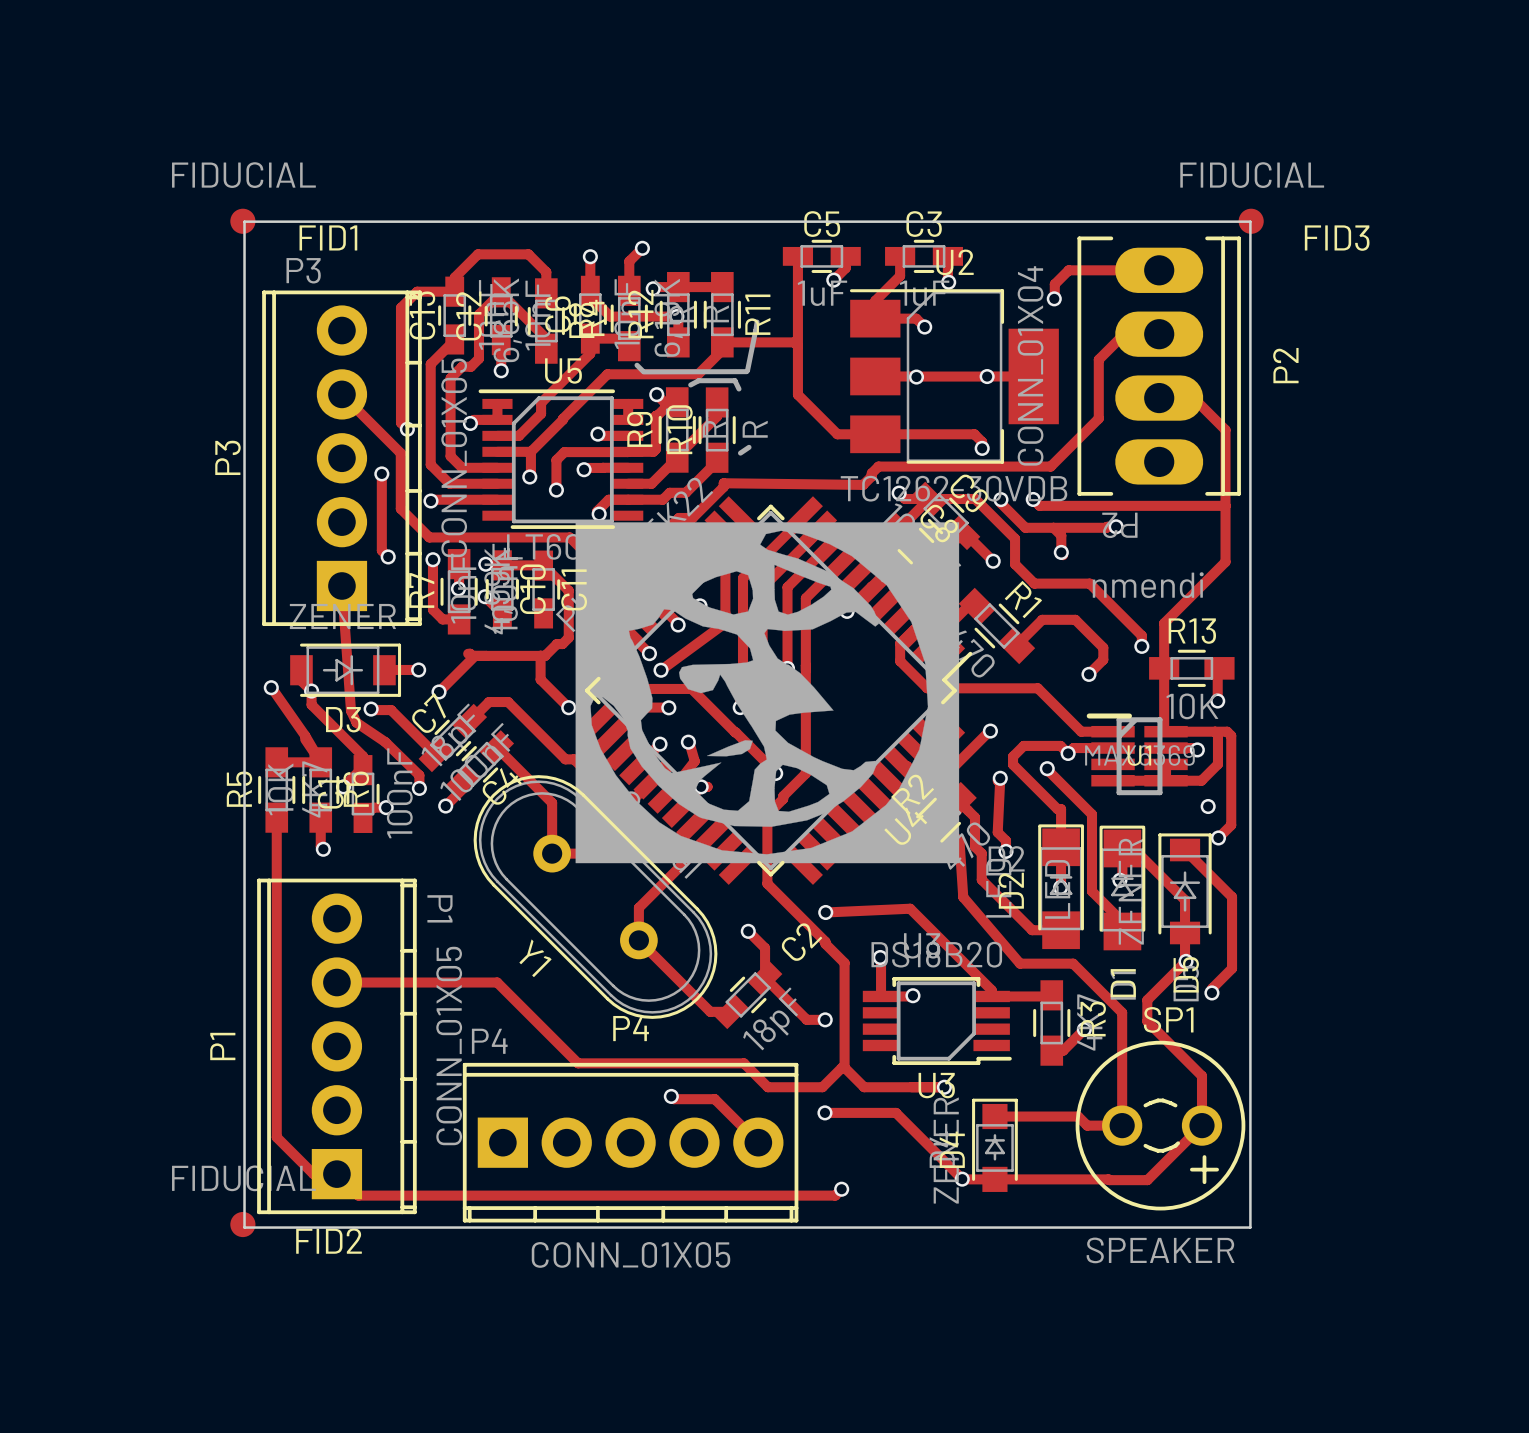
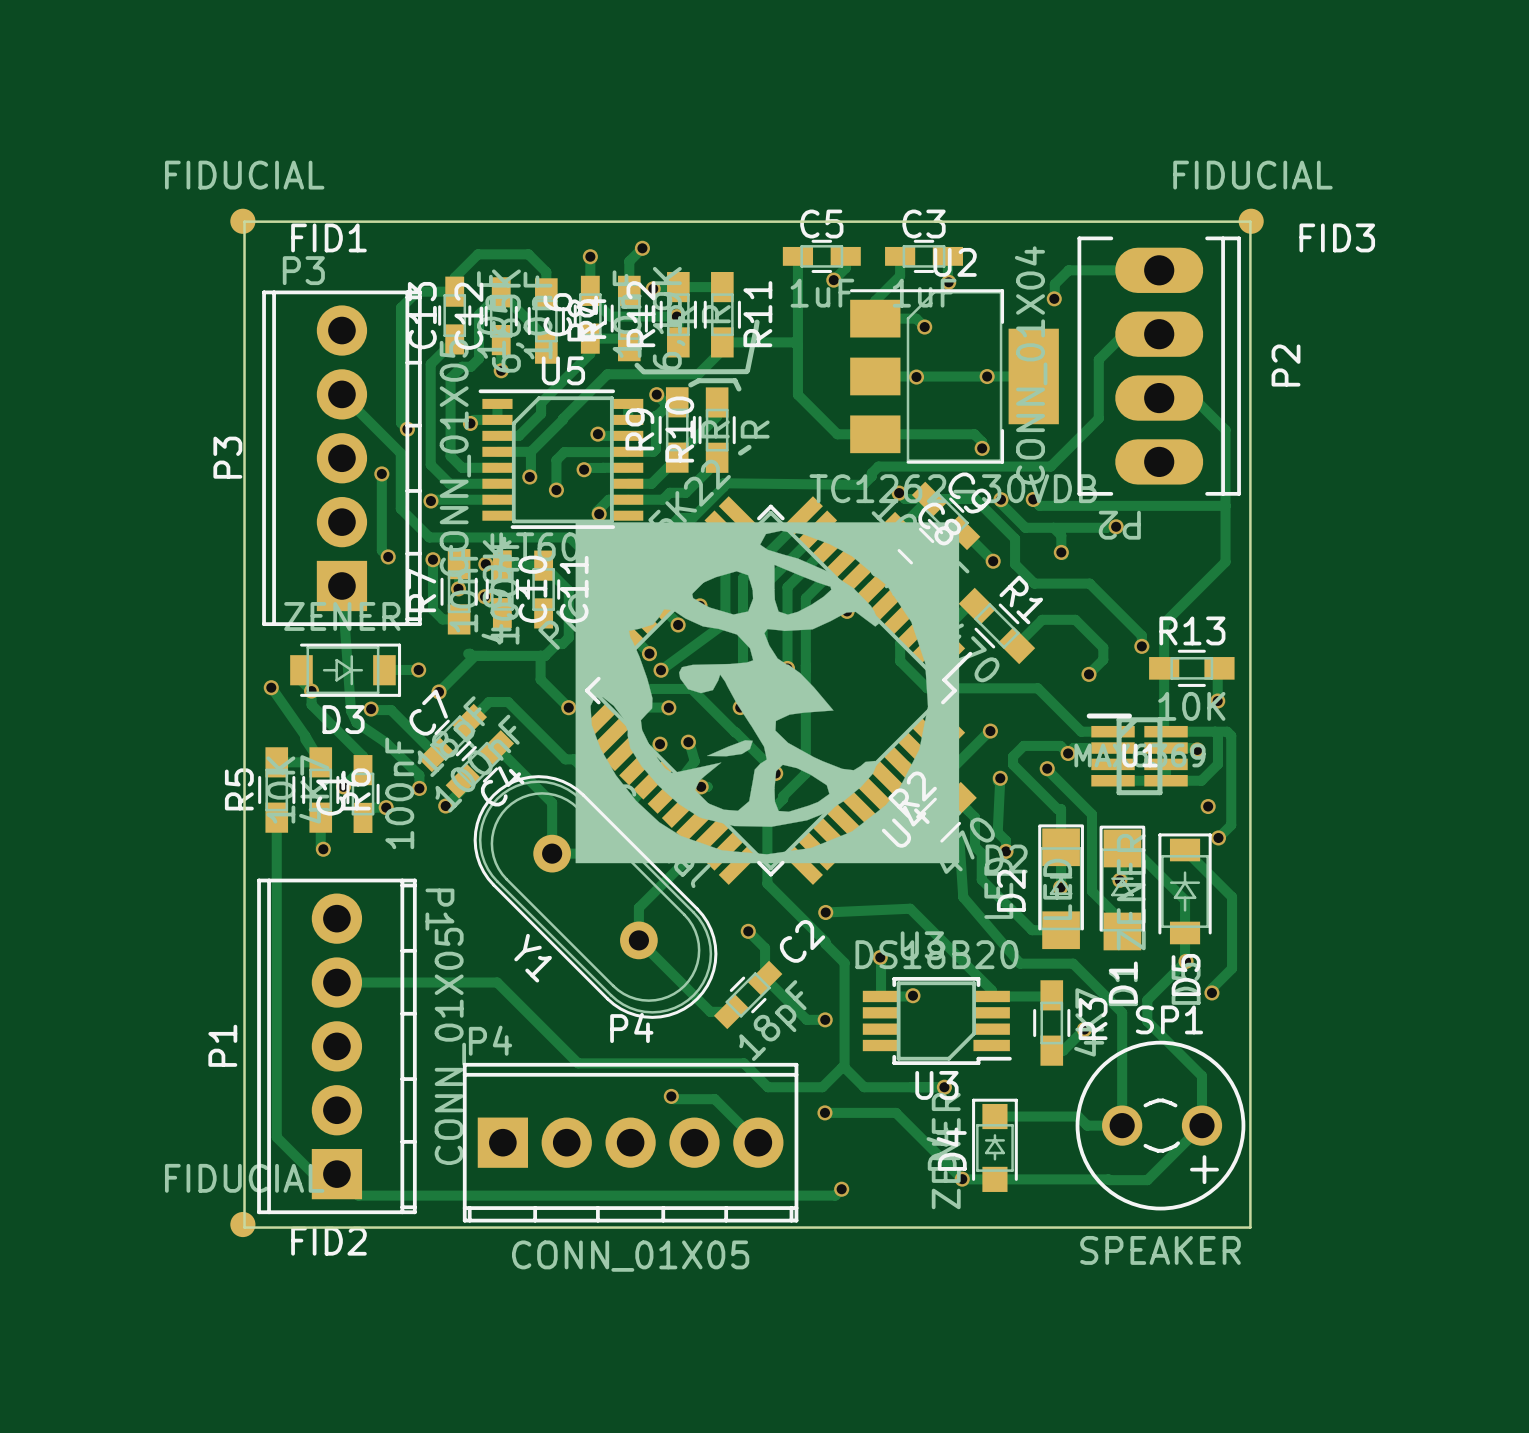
text: nmendi (1148, 585) -> none

